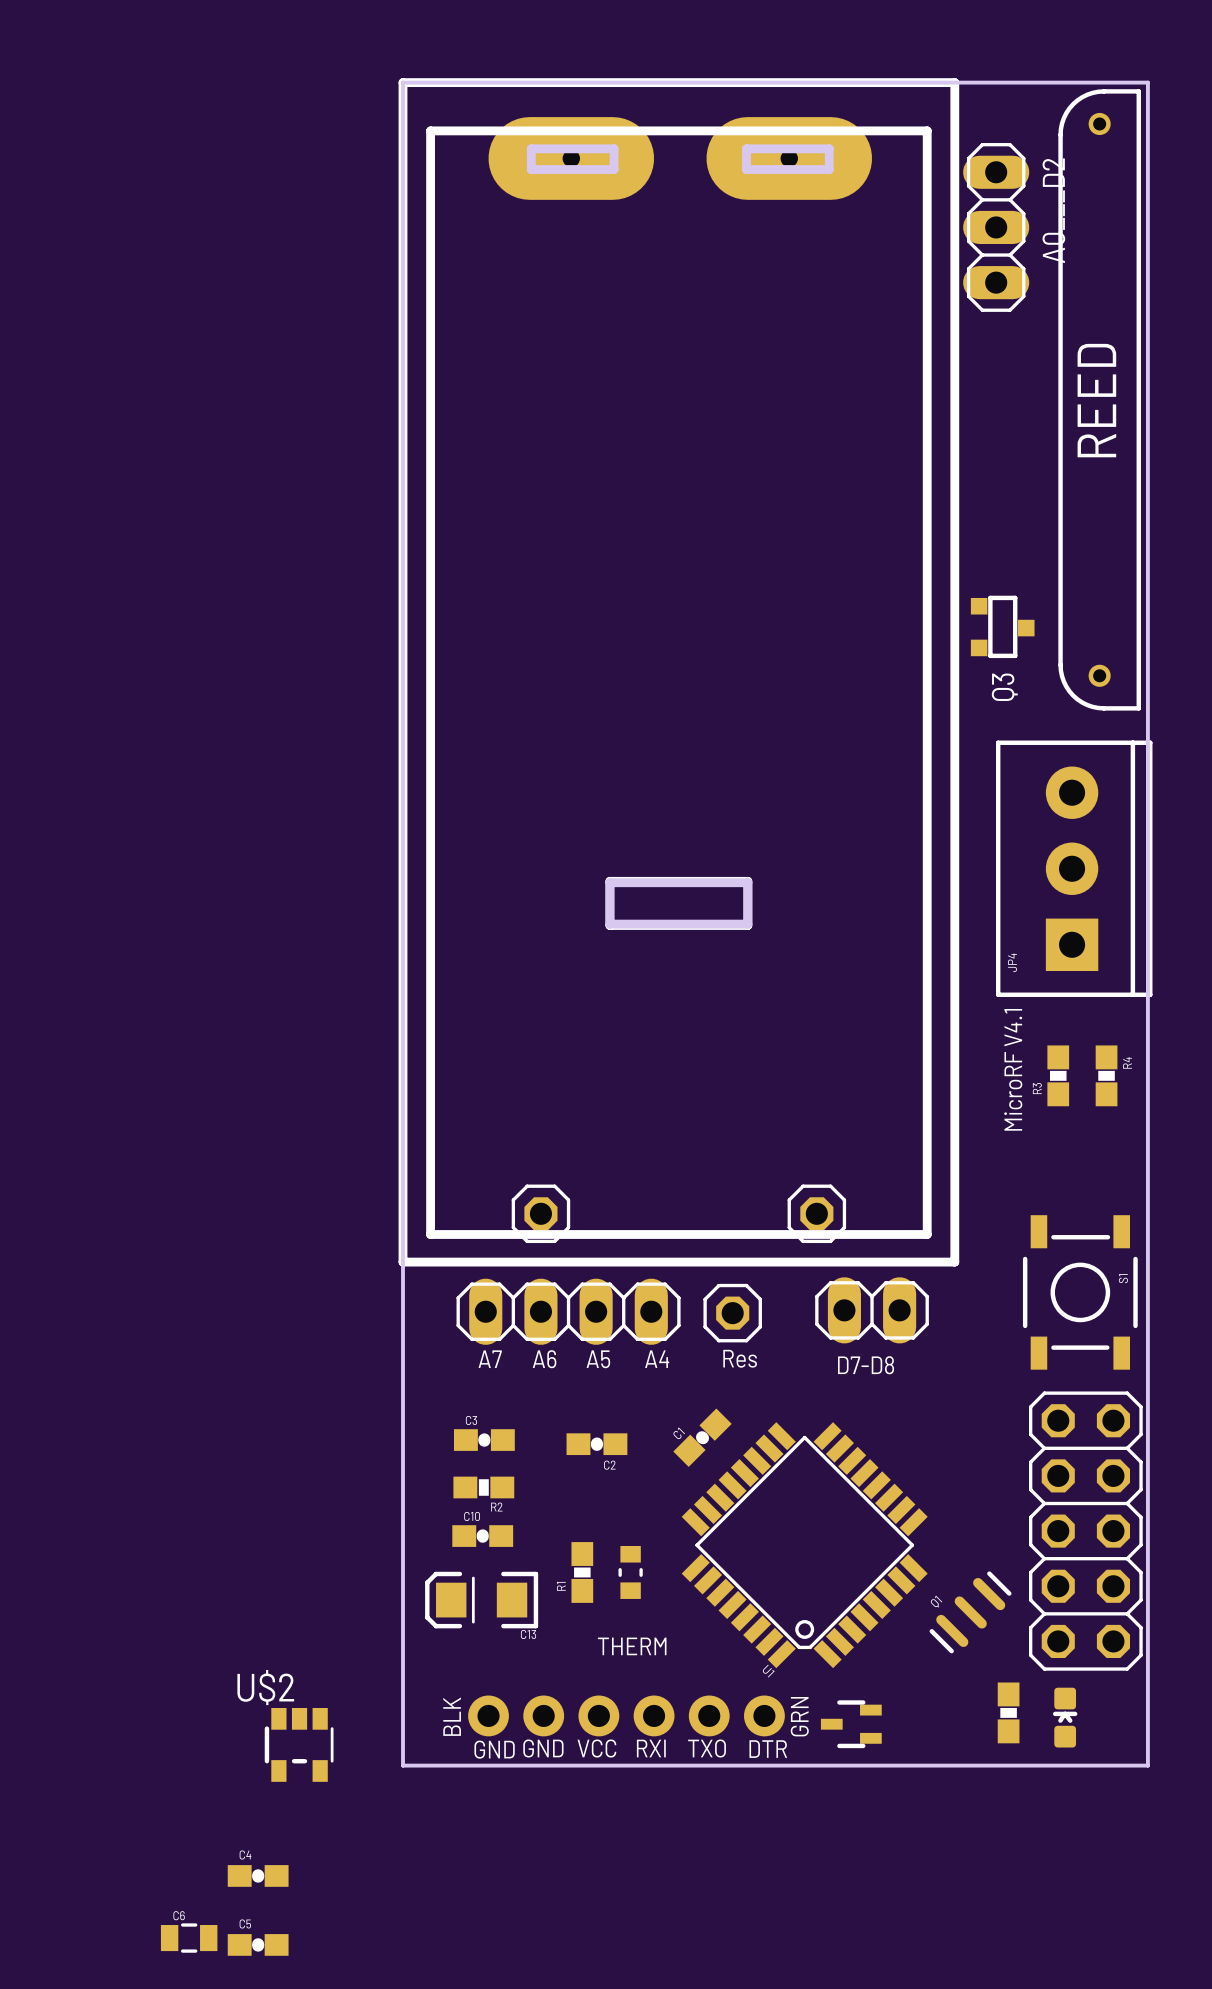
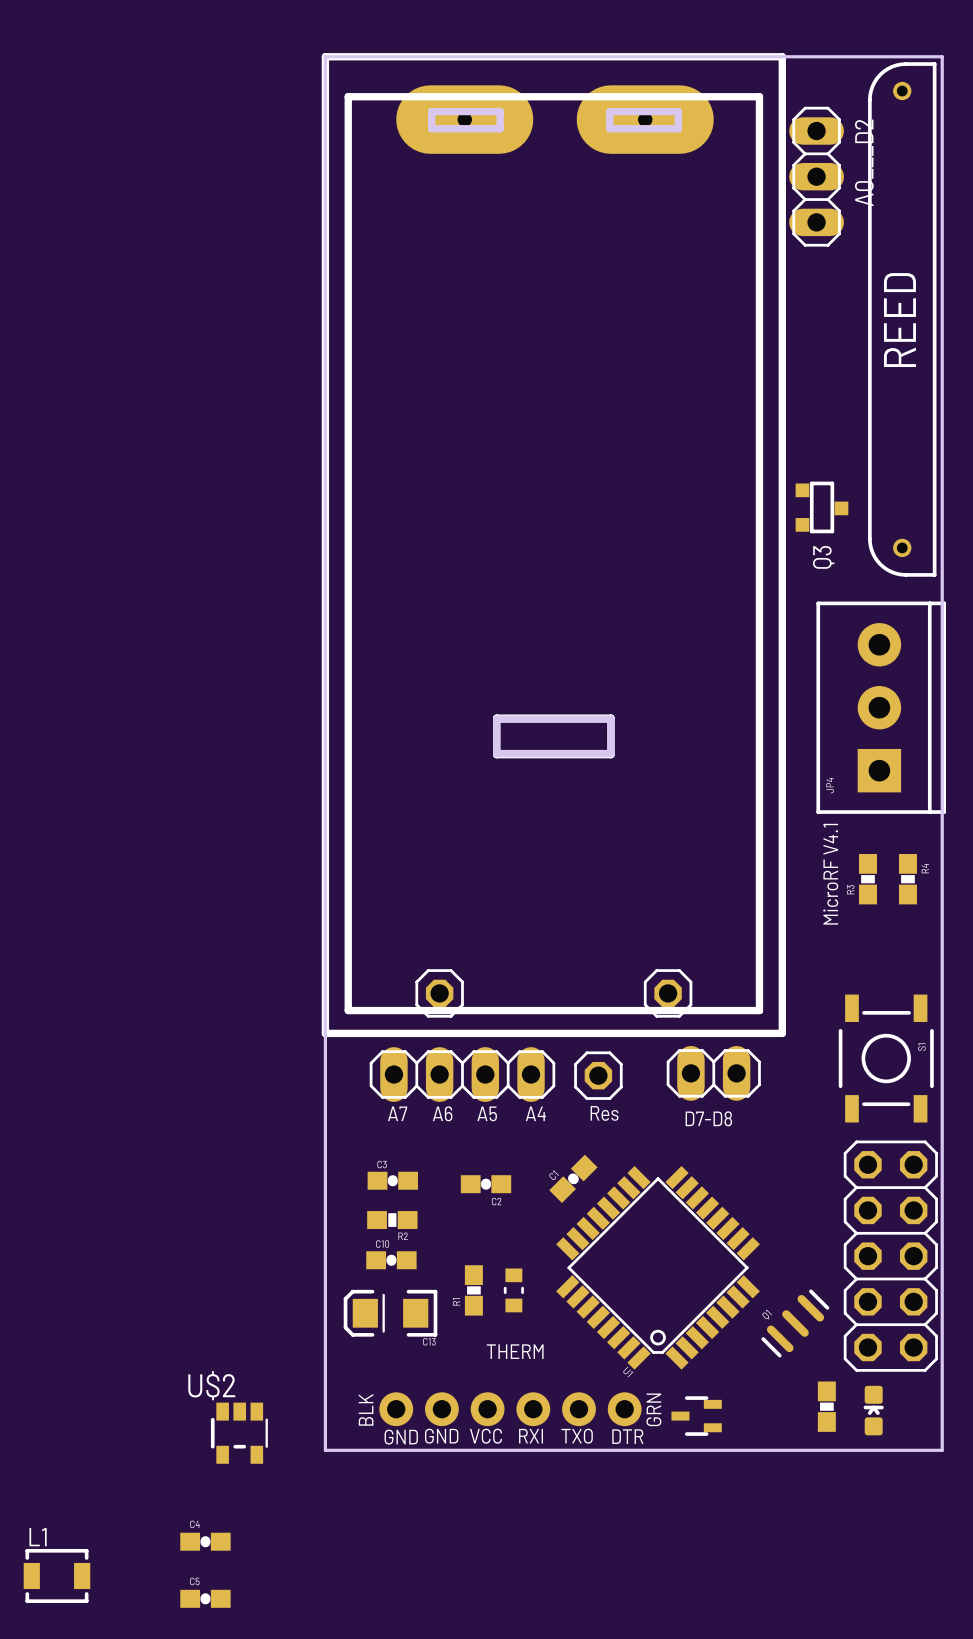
L1: none -> (56, 1575)
C6: (189, 1938) -> none

